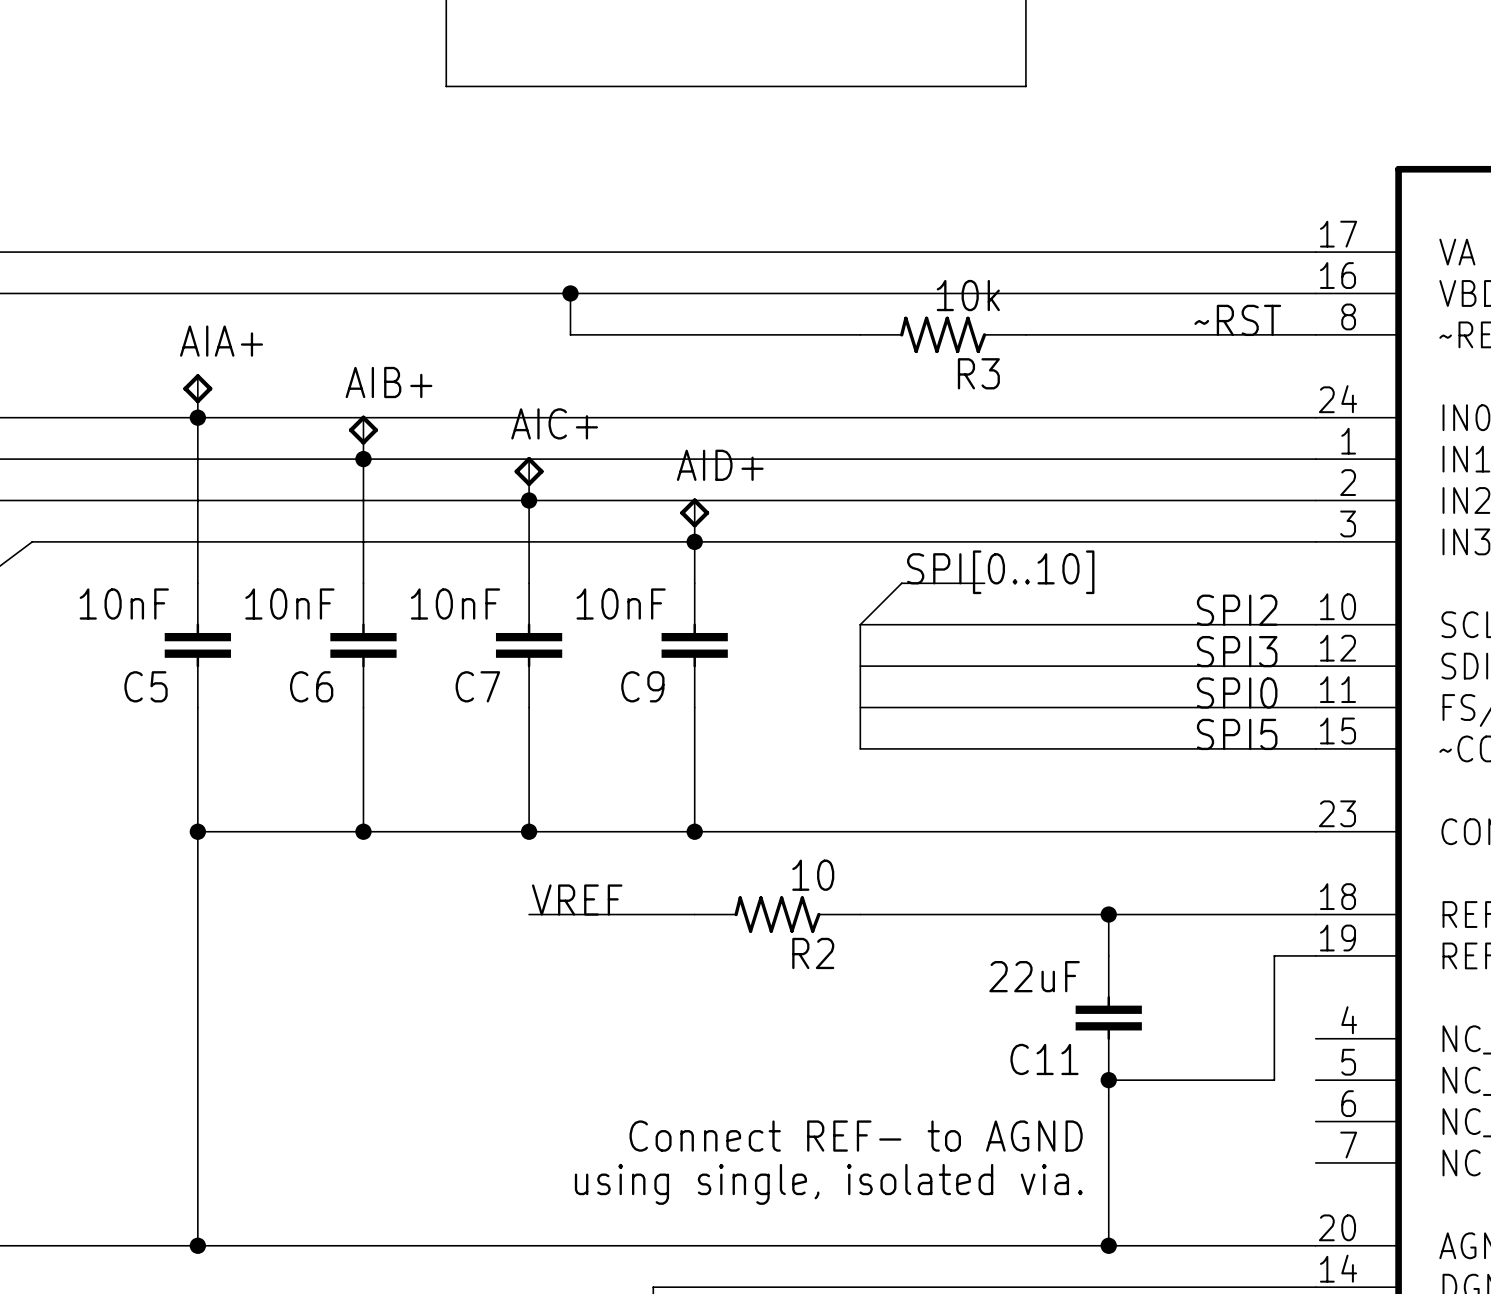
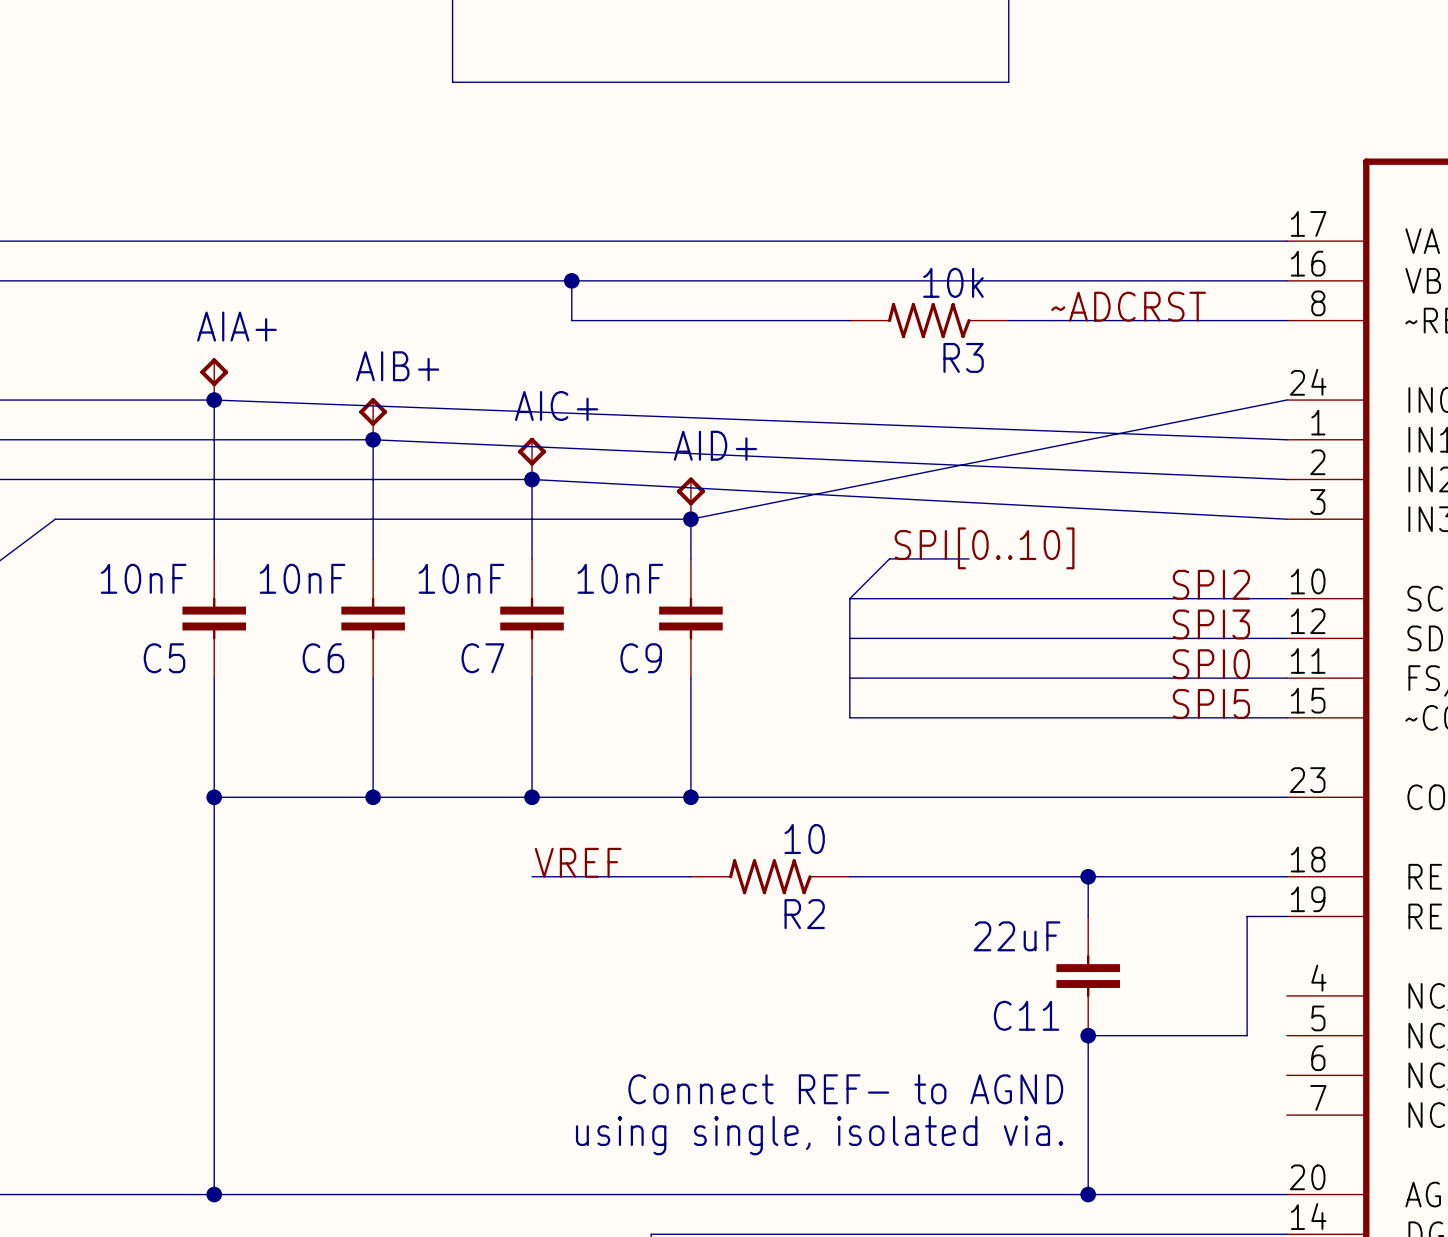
label: ~RST (1237, 320) -> ~ADCRST (1128, 306)
wire: (197, 417) (1315, 417) -> (214, 400) (1286, 439)
wire: (363, 459) (1315, 459) -> (373, 439) (1286, 479)
wire: (529, 500) (1315, 500) -> (532, 479) (1286, 519)
wire: (694, 541) (1315, 541) -> (690, 519) (1286, 400)

